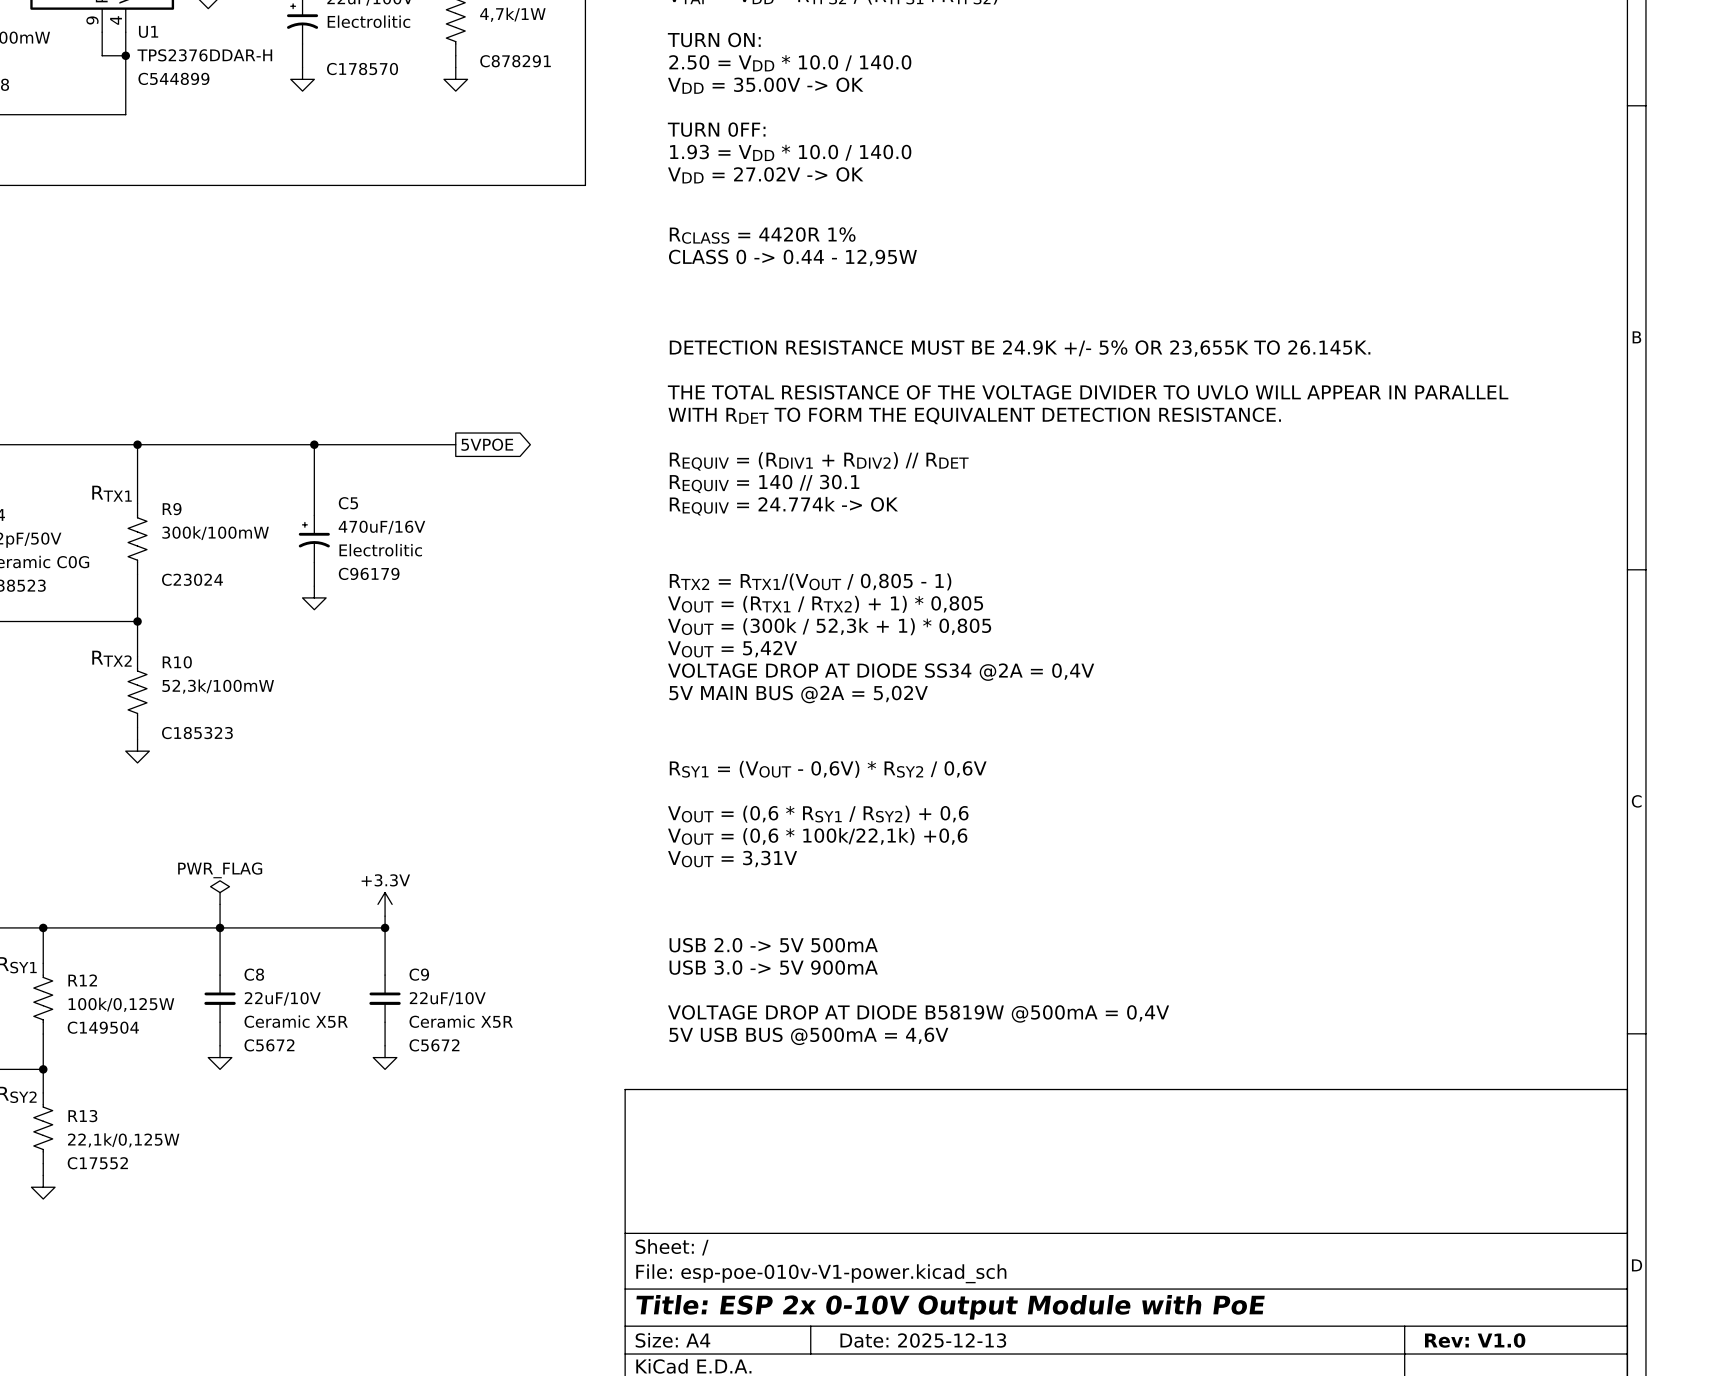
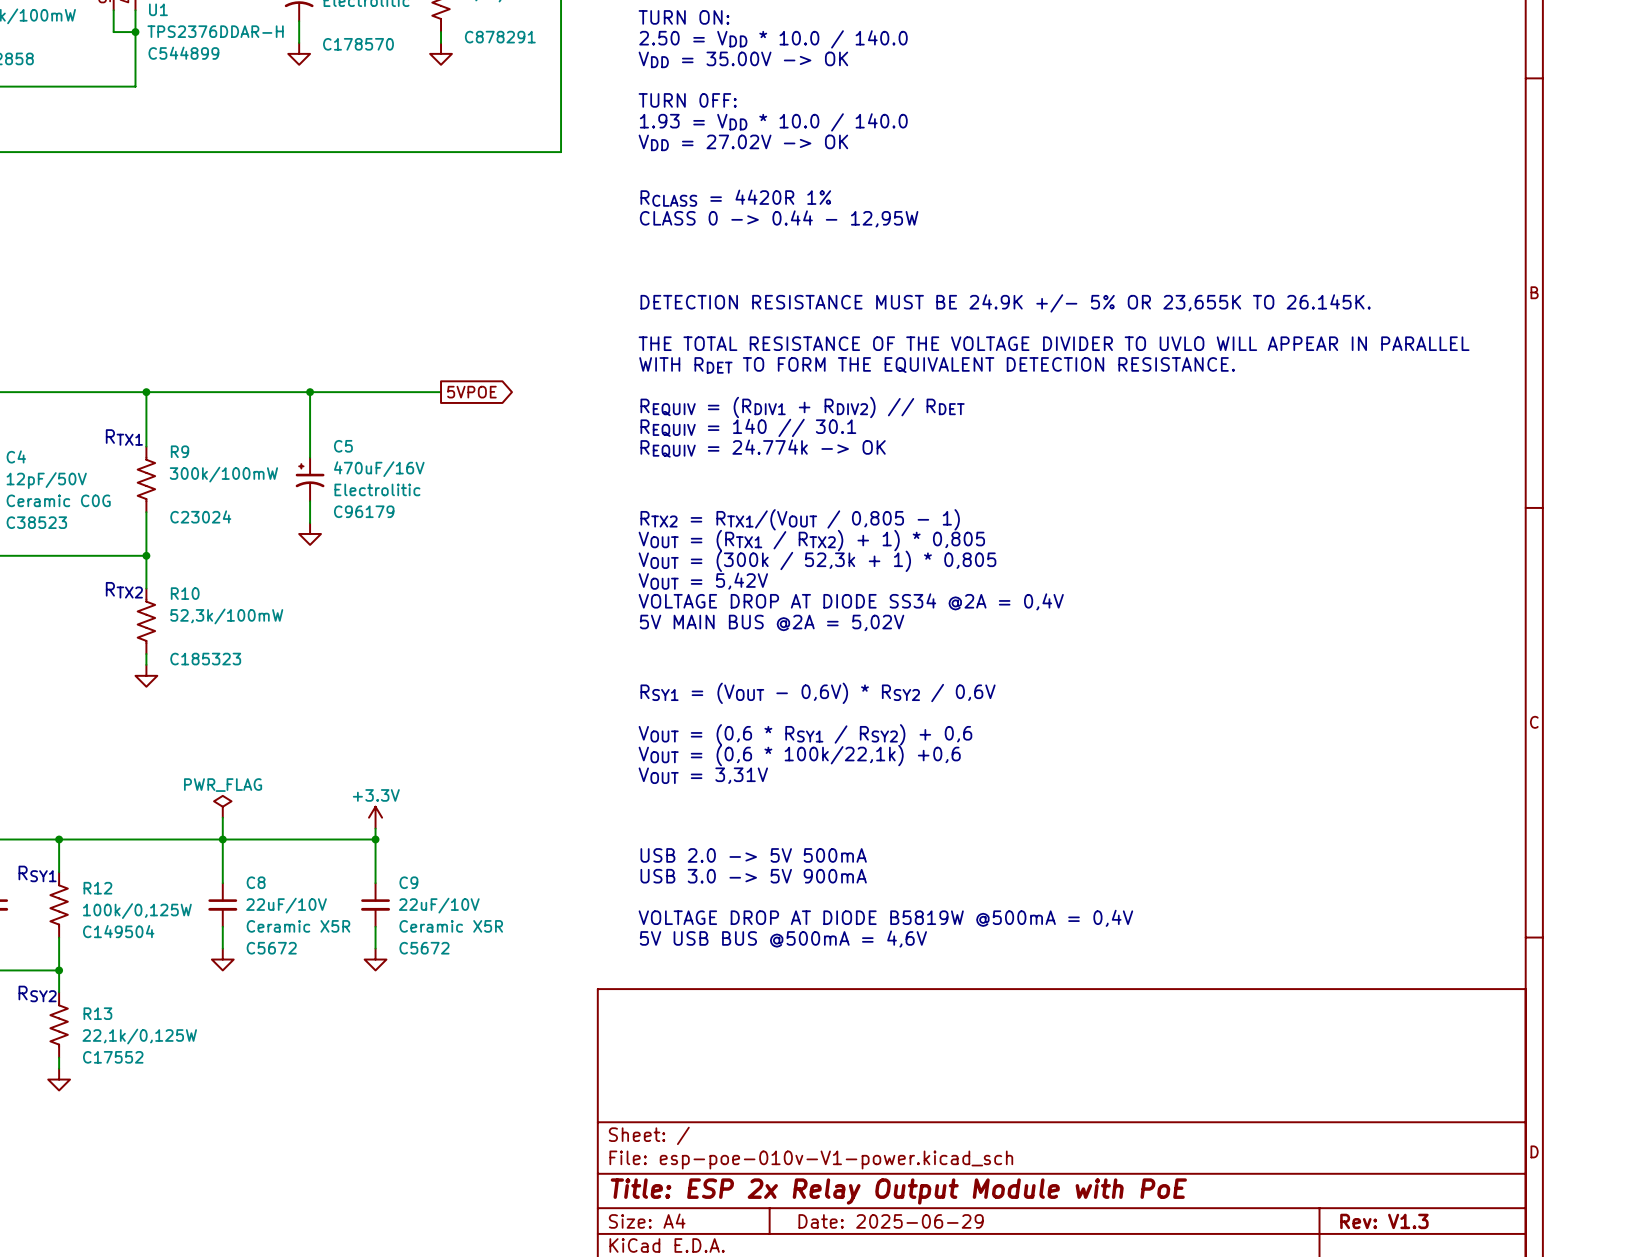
title block: Title: ESP 2x 0-10V Output Module with PoE (950, 1307) -> Title: ESP 2x Relay Output Module with PoE (898, 1191)
title block: Date: 2025-12-13 (923, 1340) -> Date: 2025-06-29 (891, 1221)
title block: Rev: V1.0 (1475, 1340) -> Rev: V1.3 (1384, 1221)

